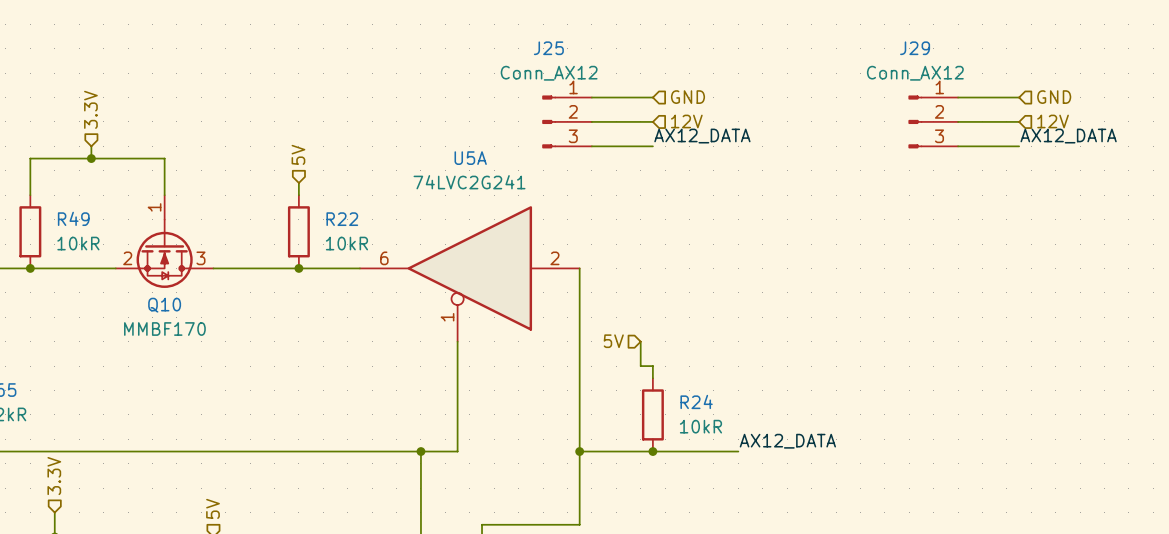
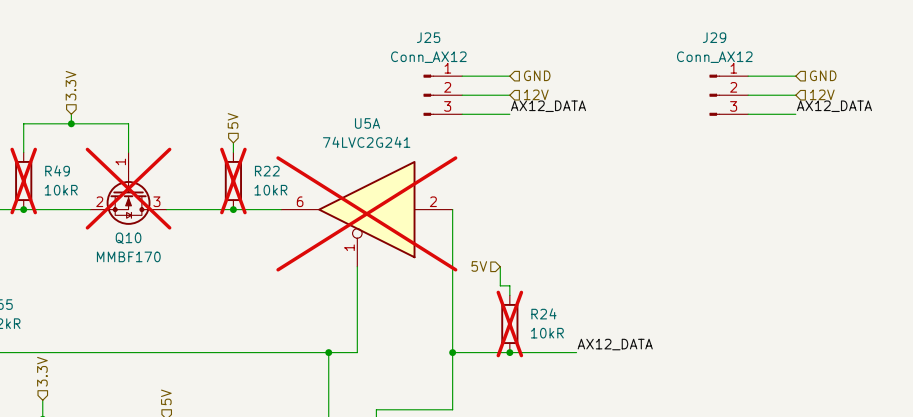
R49 do-not-place cross: none -> (23, 181)
R22 do-not-place cross: none -> (233, 181)
Q10 do-not-place cross: none -> (128, 188)
U5A do-not-place cross: none -> (366, 213)
R24 do-not-place cross: none -> (509, 323)

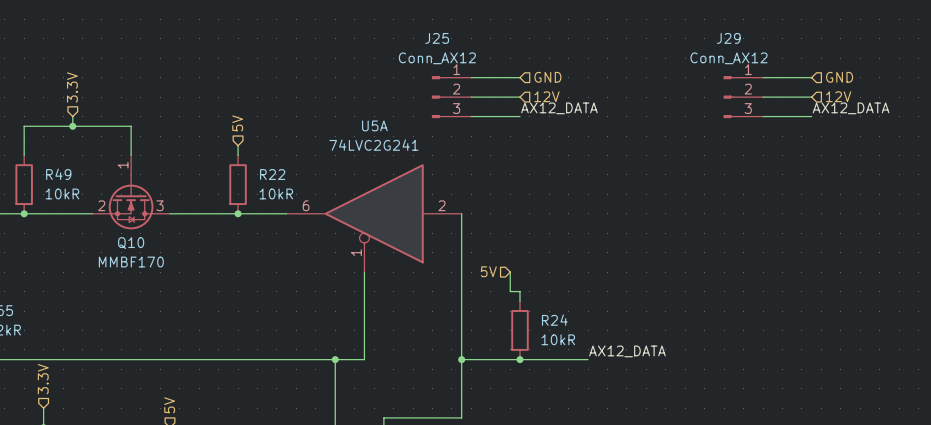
R49 do-not-place cross: (23, 181) -> none
R22 do-not-place cross: (233, 181) -> none
Q10 do-not-place cross: (128, 188) -> none
U5A do-not-place cross: (366, 213) -> none
R24 do-not-place cross: (509, 323) -> none

